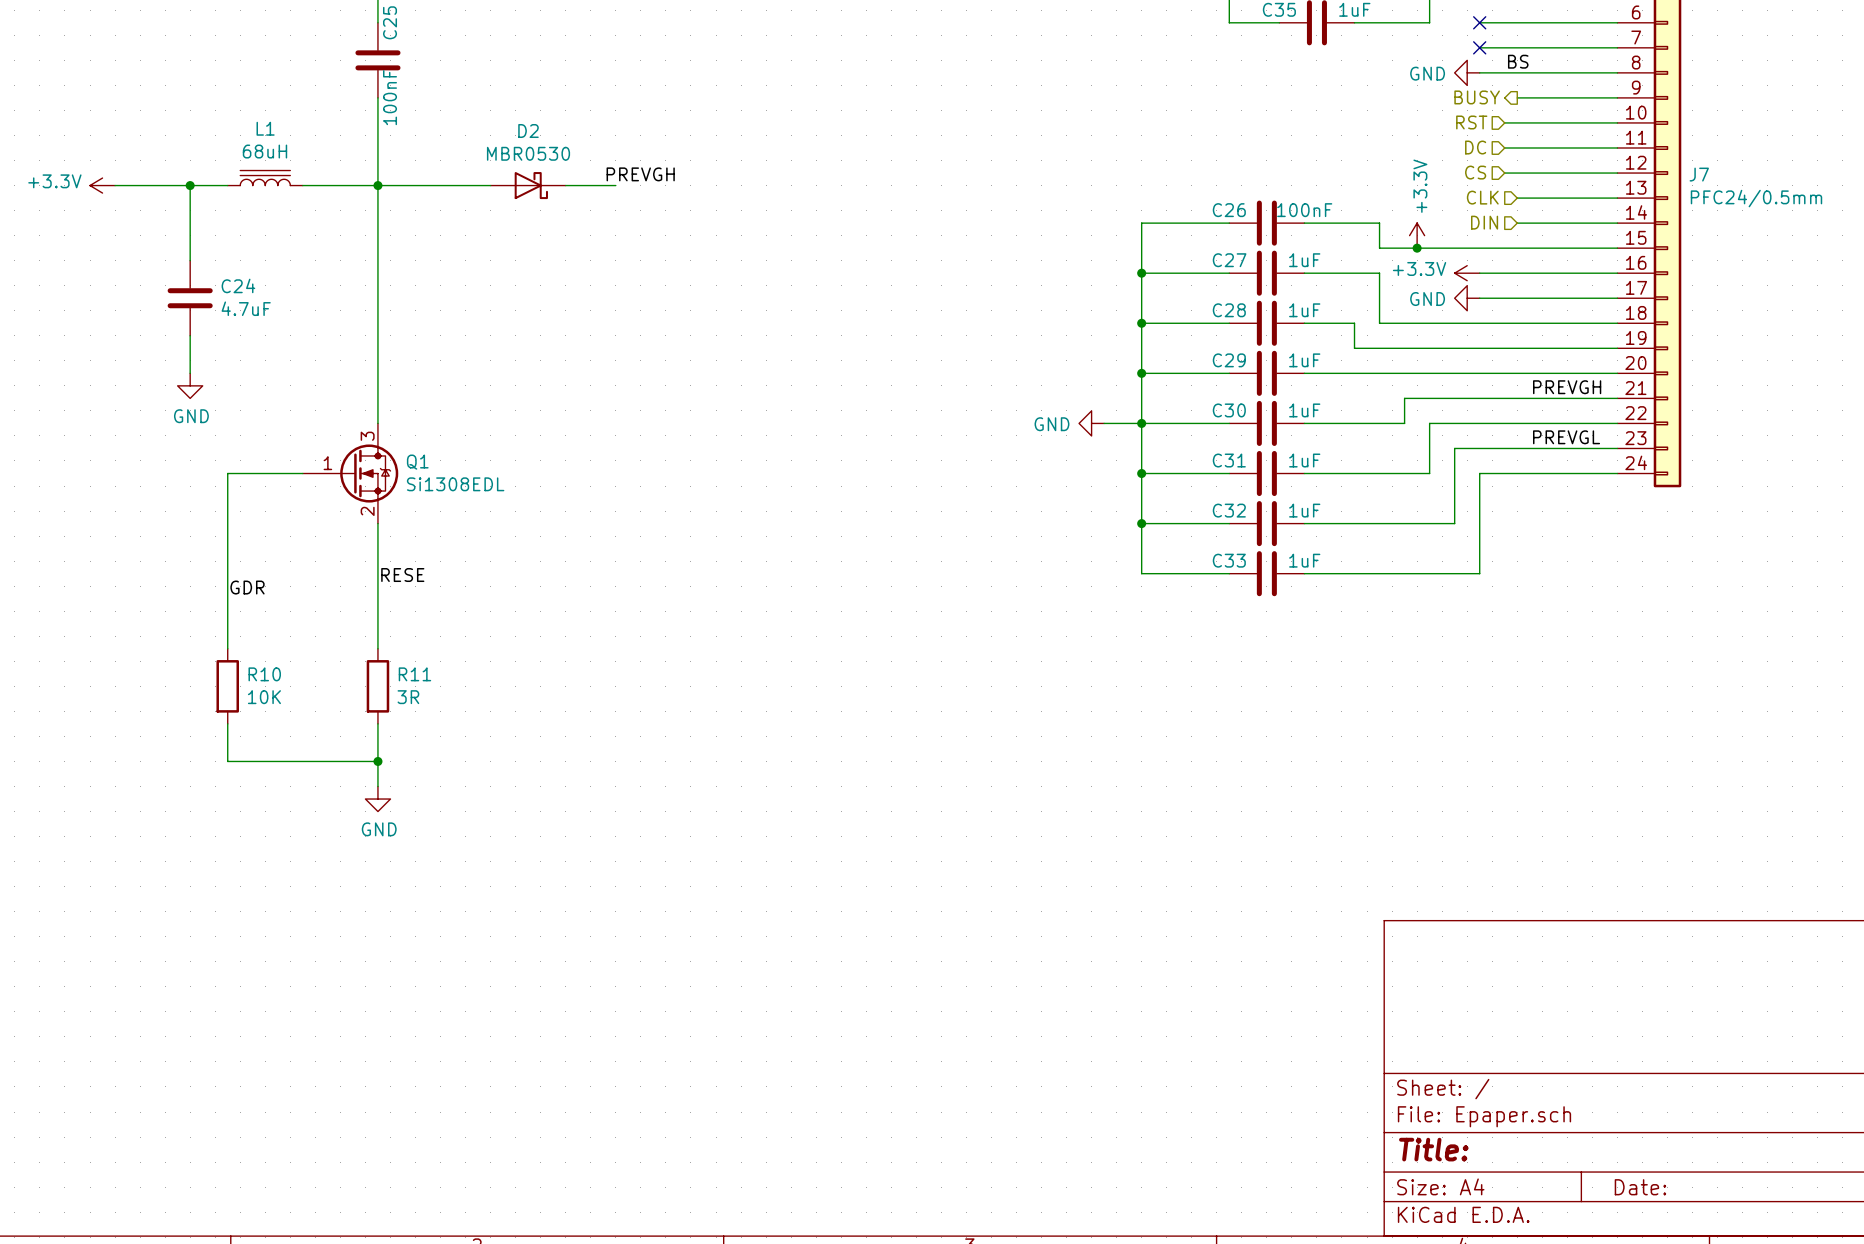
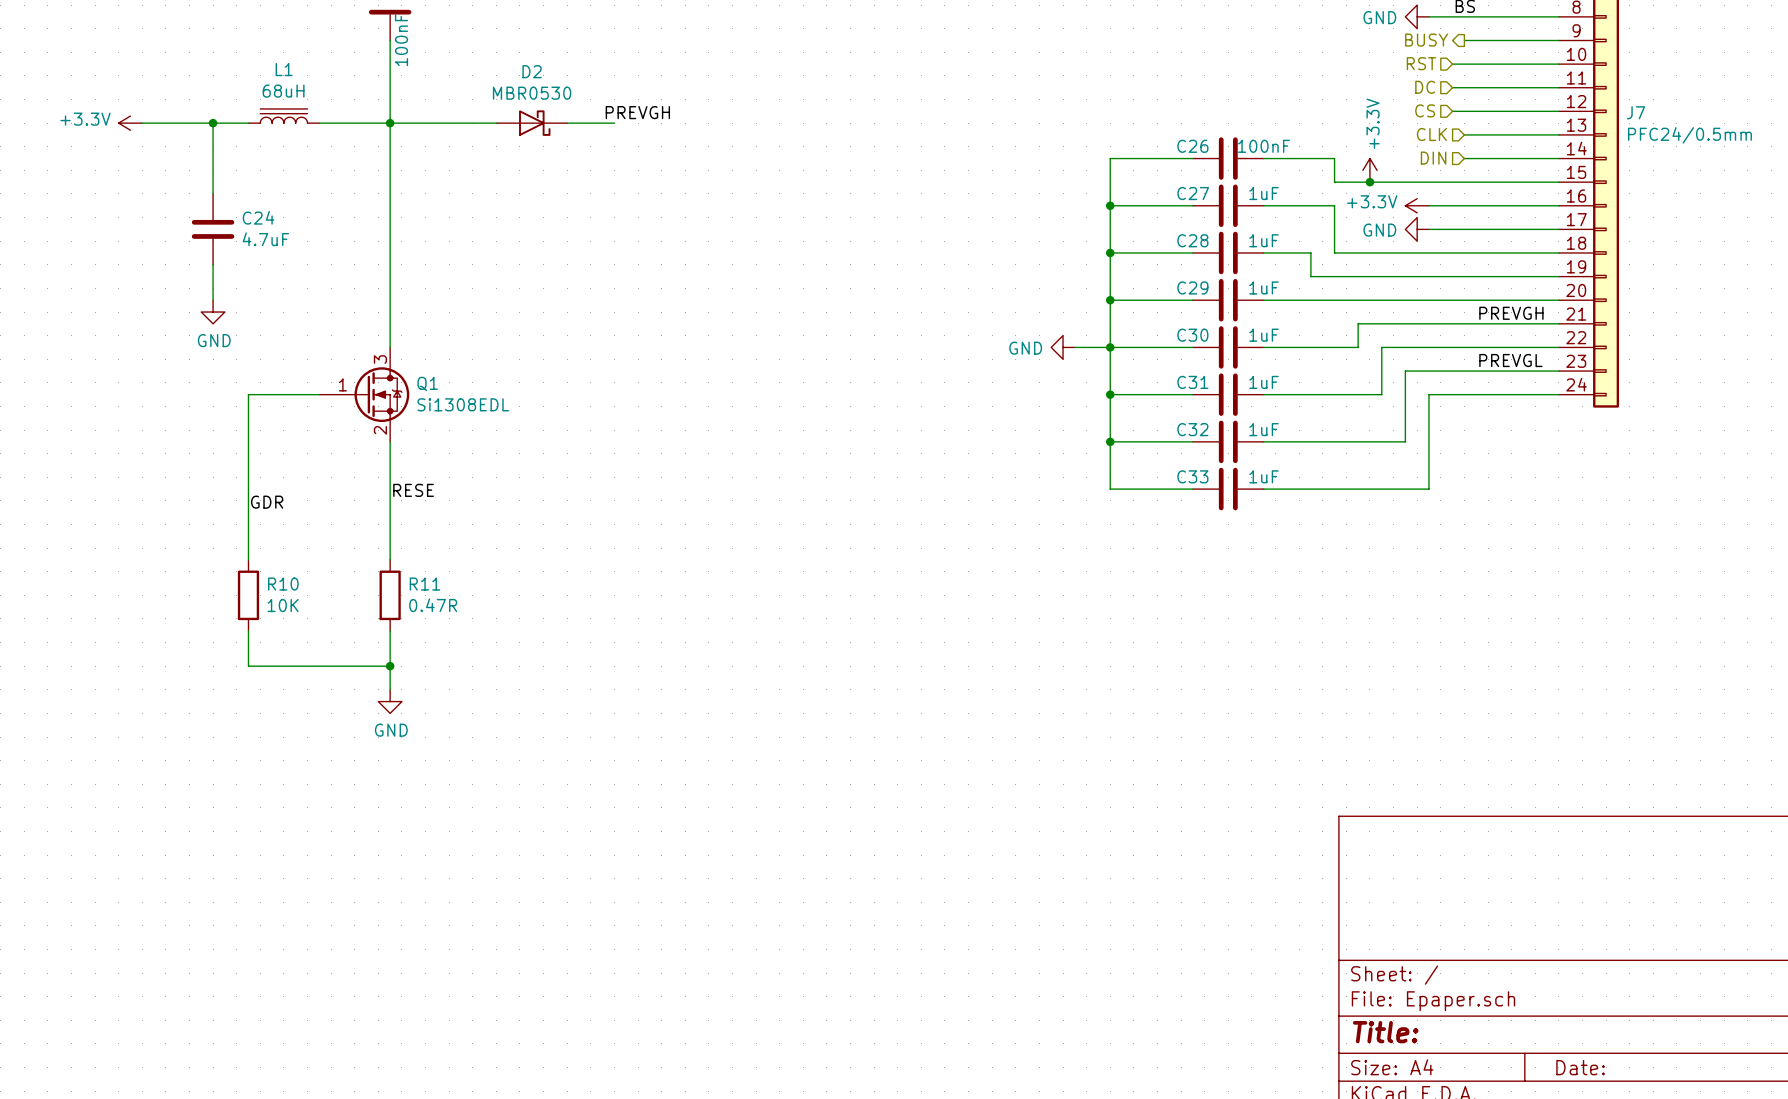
R11 value: 3R (408, 697) -> 0.47R (433, 605)

